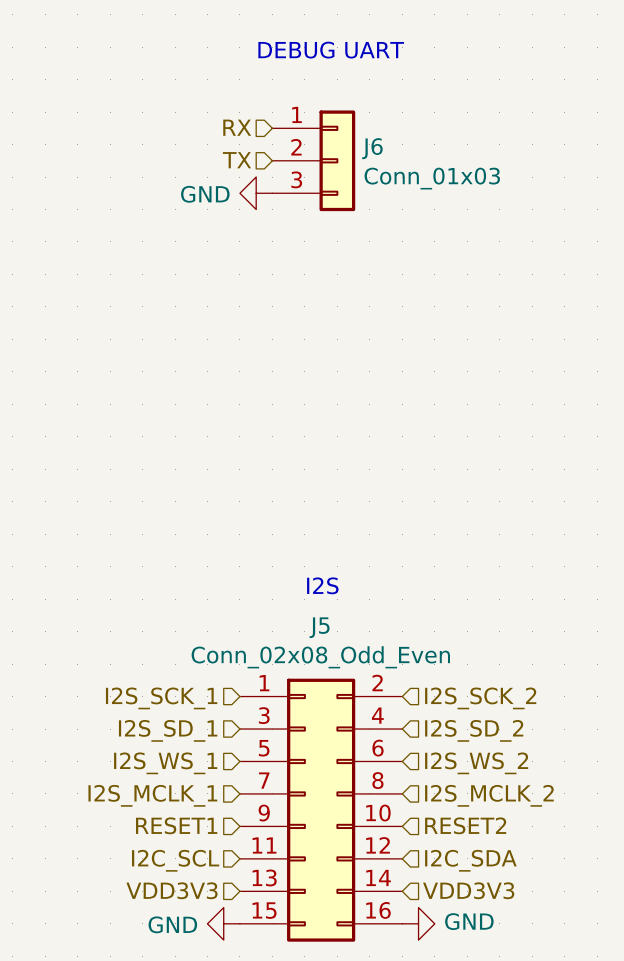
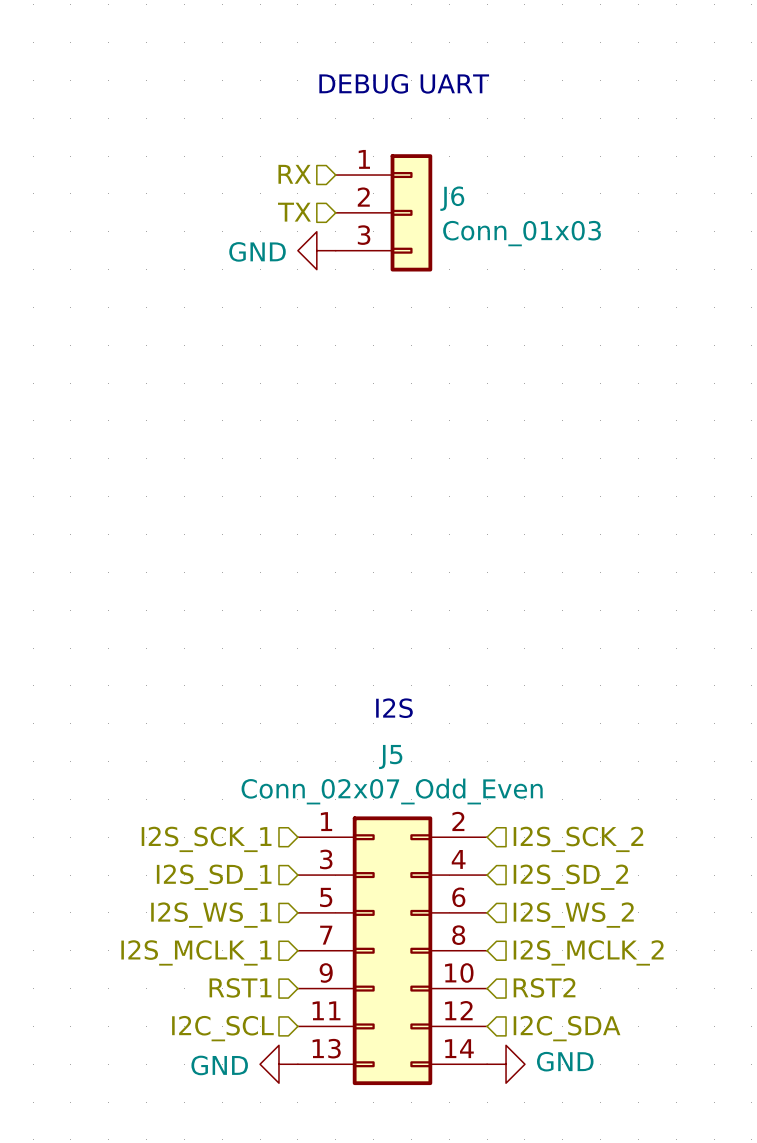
J5 value: Conn_02x08_Odd_Even (320, 657) -> Conn_02x07_Odd_Even (392, 791)
J5 symbol: [239, 678, 403, 942] -> [297, 816, 488, 1086]
hierarchical label: RESET1 (176, 825) -> RST1 (240, 987)
hierarchical label: RESET2 (465, 825) -> RST2 (544, 987)
hierarchical label: VDD3V3 (171, 890) -> none
hierarchical label: VDD3V3 (468, 890) -> none
power symbol position: GND (223, 923) -> GND (278, 1064)
power symbol position: GND (418, 923) -> GND (506, 1064)

